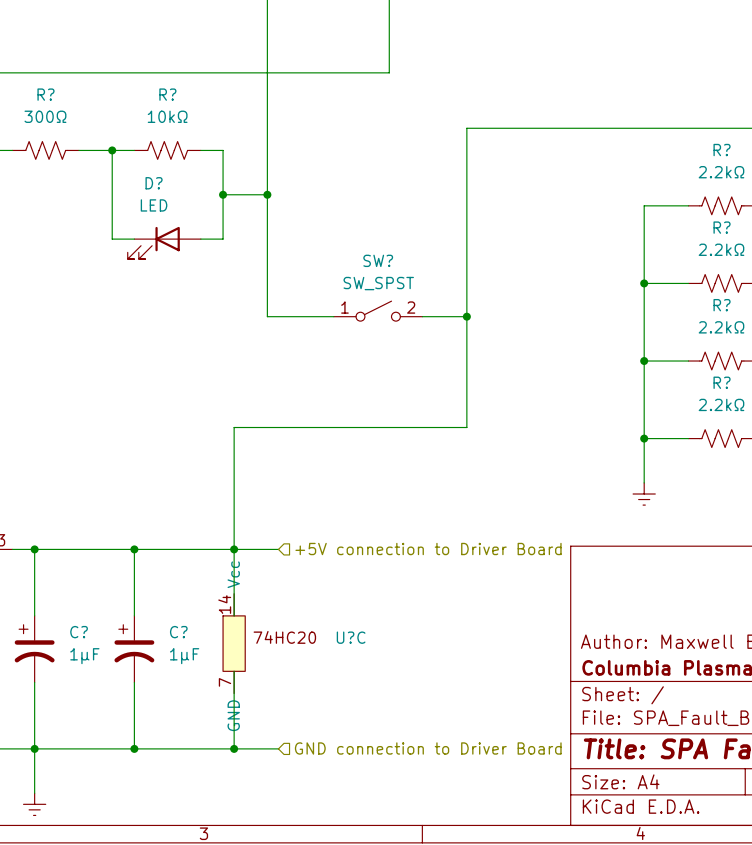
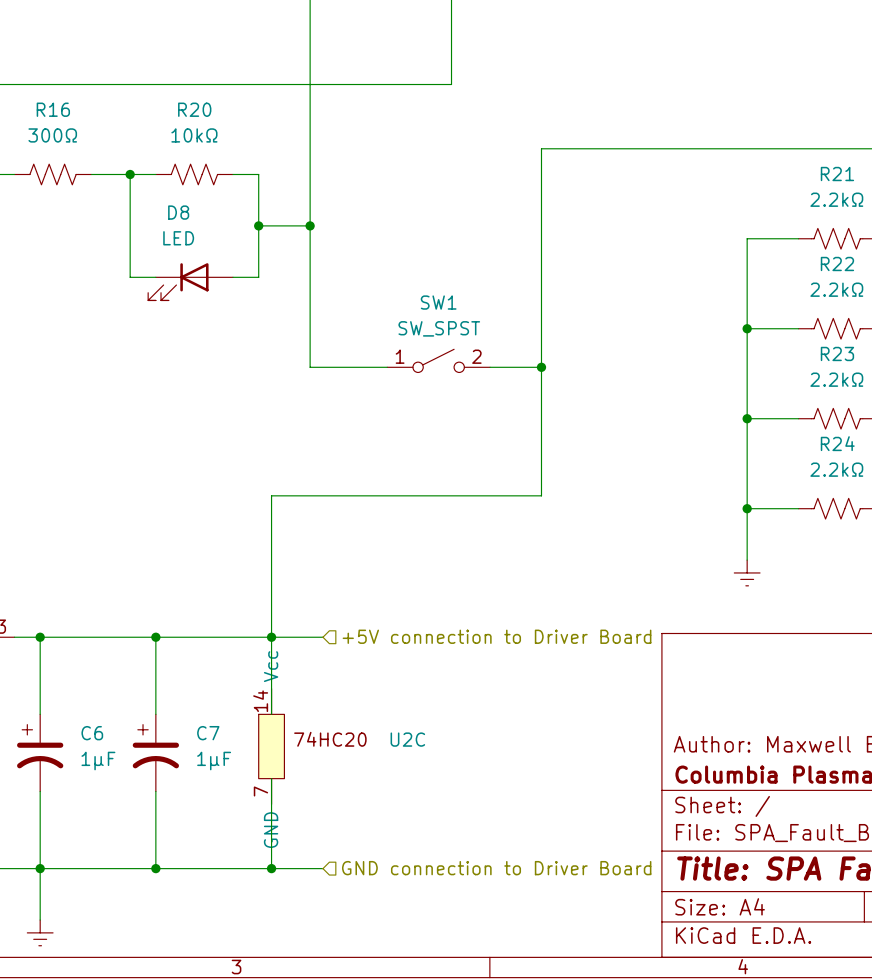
R? name: R? (45, 94) -> R16 (53, 109)
R? name: R? (167, 94) -> R20 (194, 109)
R? name: R? (722, 150) -> R21 (837, 174)
D? name: D? (154, 183) -> D8 (178, 212)
R? name: R? (722, 227) -> R22 (837, 263)
SW? name: SW? (378, 260) -> SW1 (438, 302)
R? name: R? (722, 305) -> R23 (837, 353)
R? name: R? (722, 382) -> R24 (837, 443)
C? name: C? (79, 632) -> C6 (92, 733)
C? name: C? (178, 632) -> C7 (208, 733)
U?C name: U?C (351, 637) -> U2C (407, 739)

